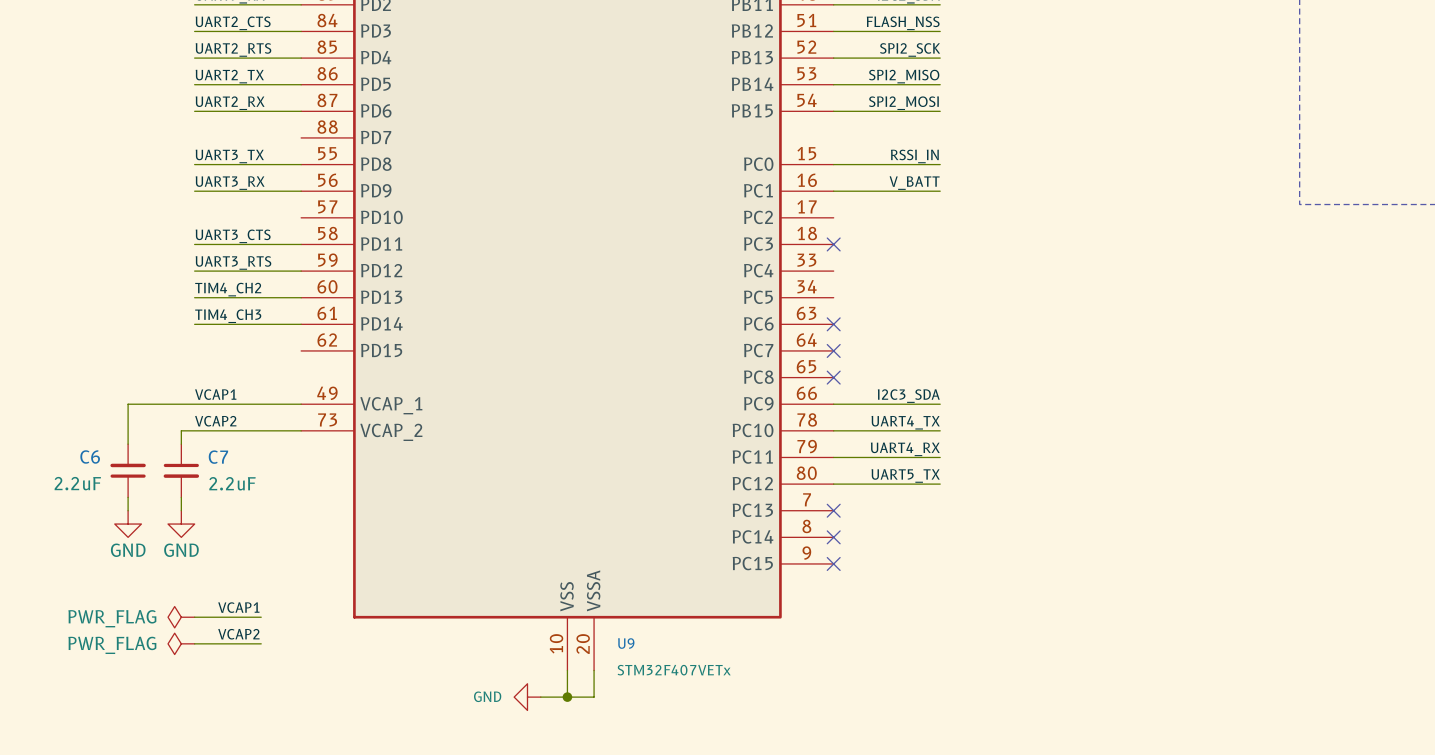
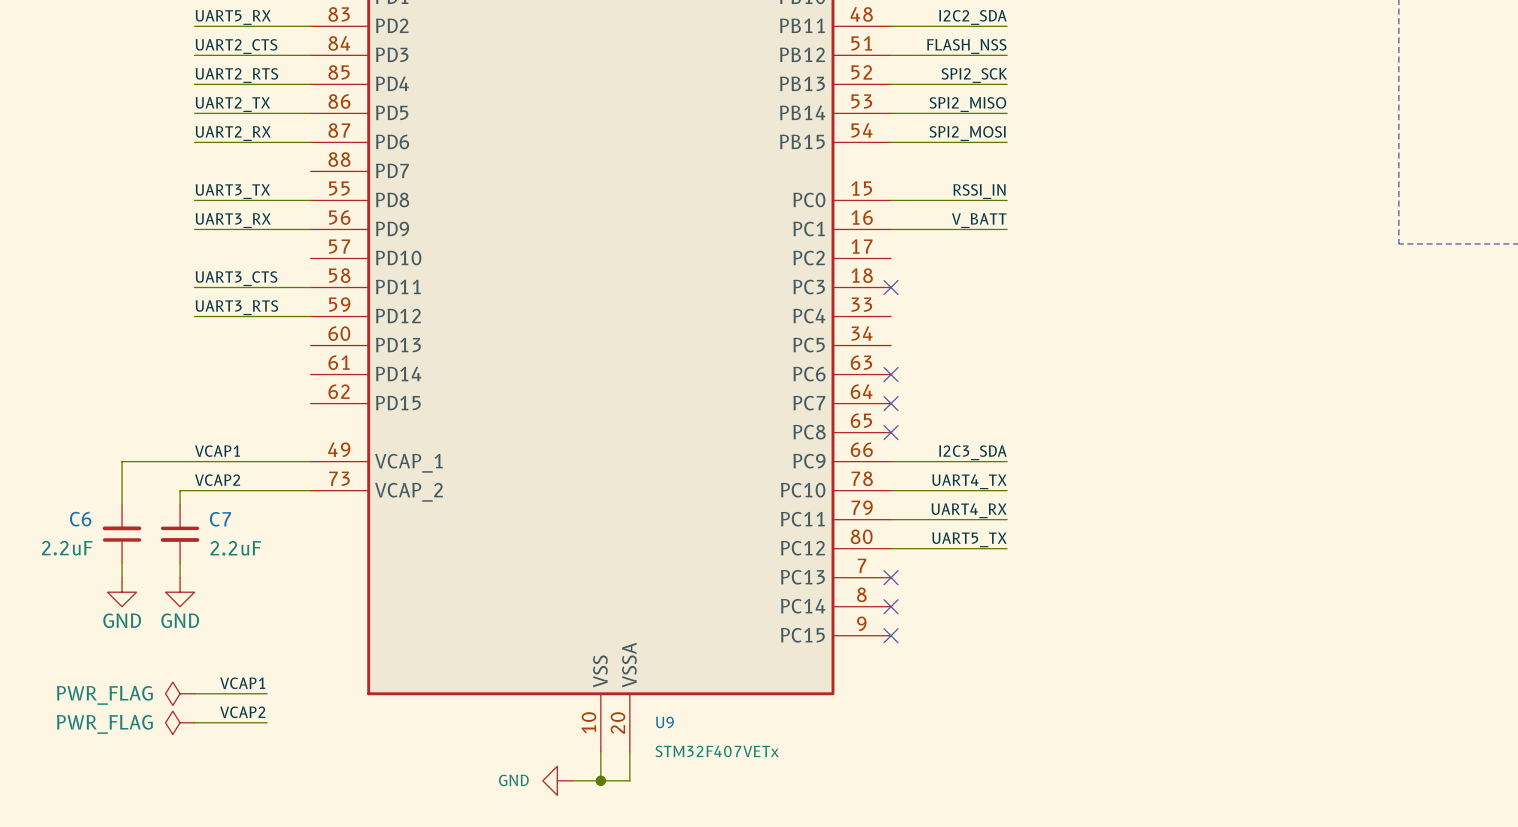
label: TIM4_CH2 (228, 289) -> none
wire: (194, 297) (301, 297) -> none
label: TIM4_CH3 (228, 316) -> none
wire: (194, 324) (301, 324) -> none

